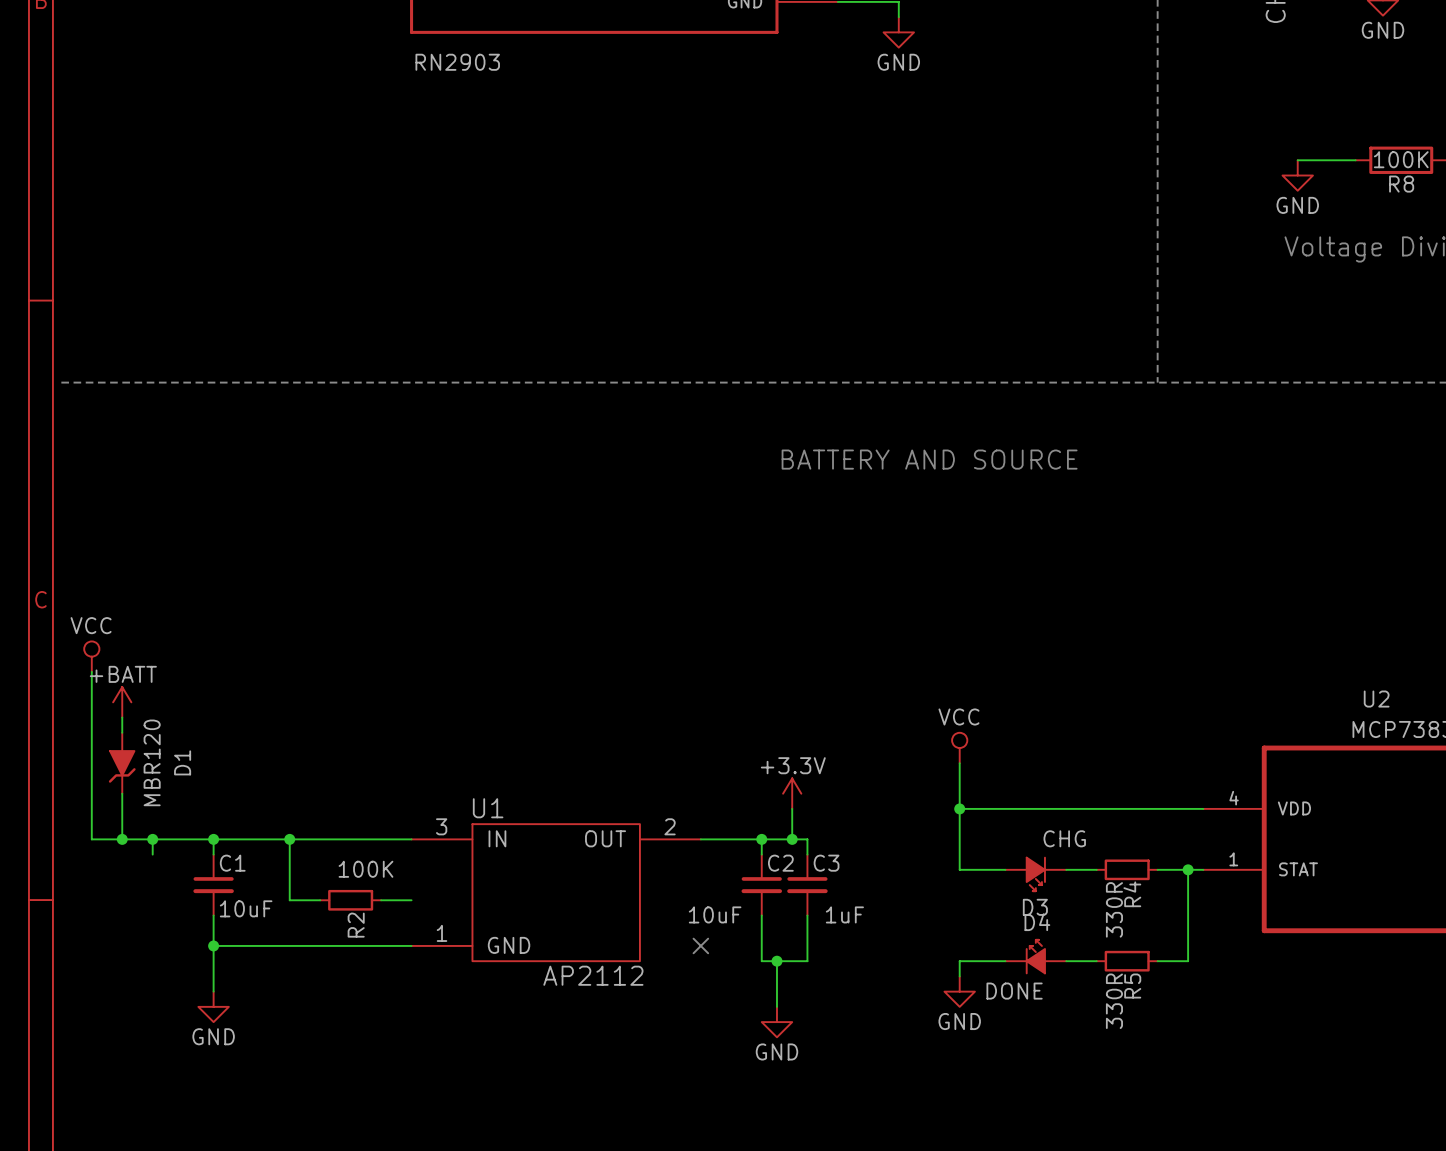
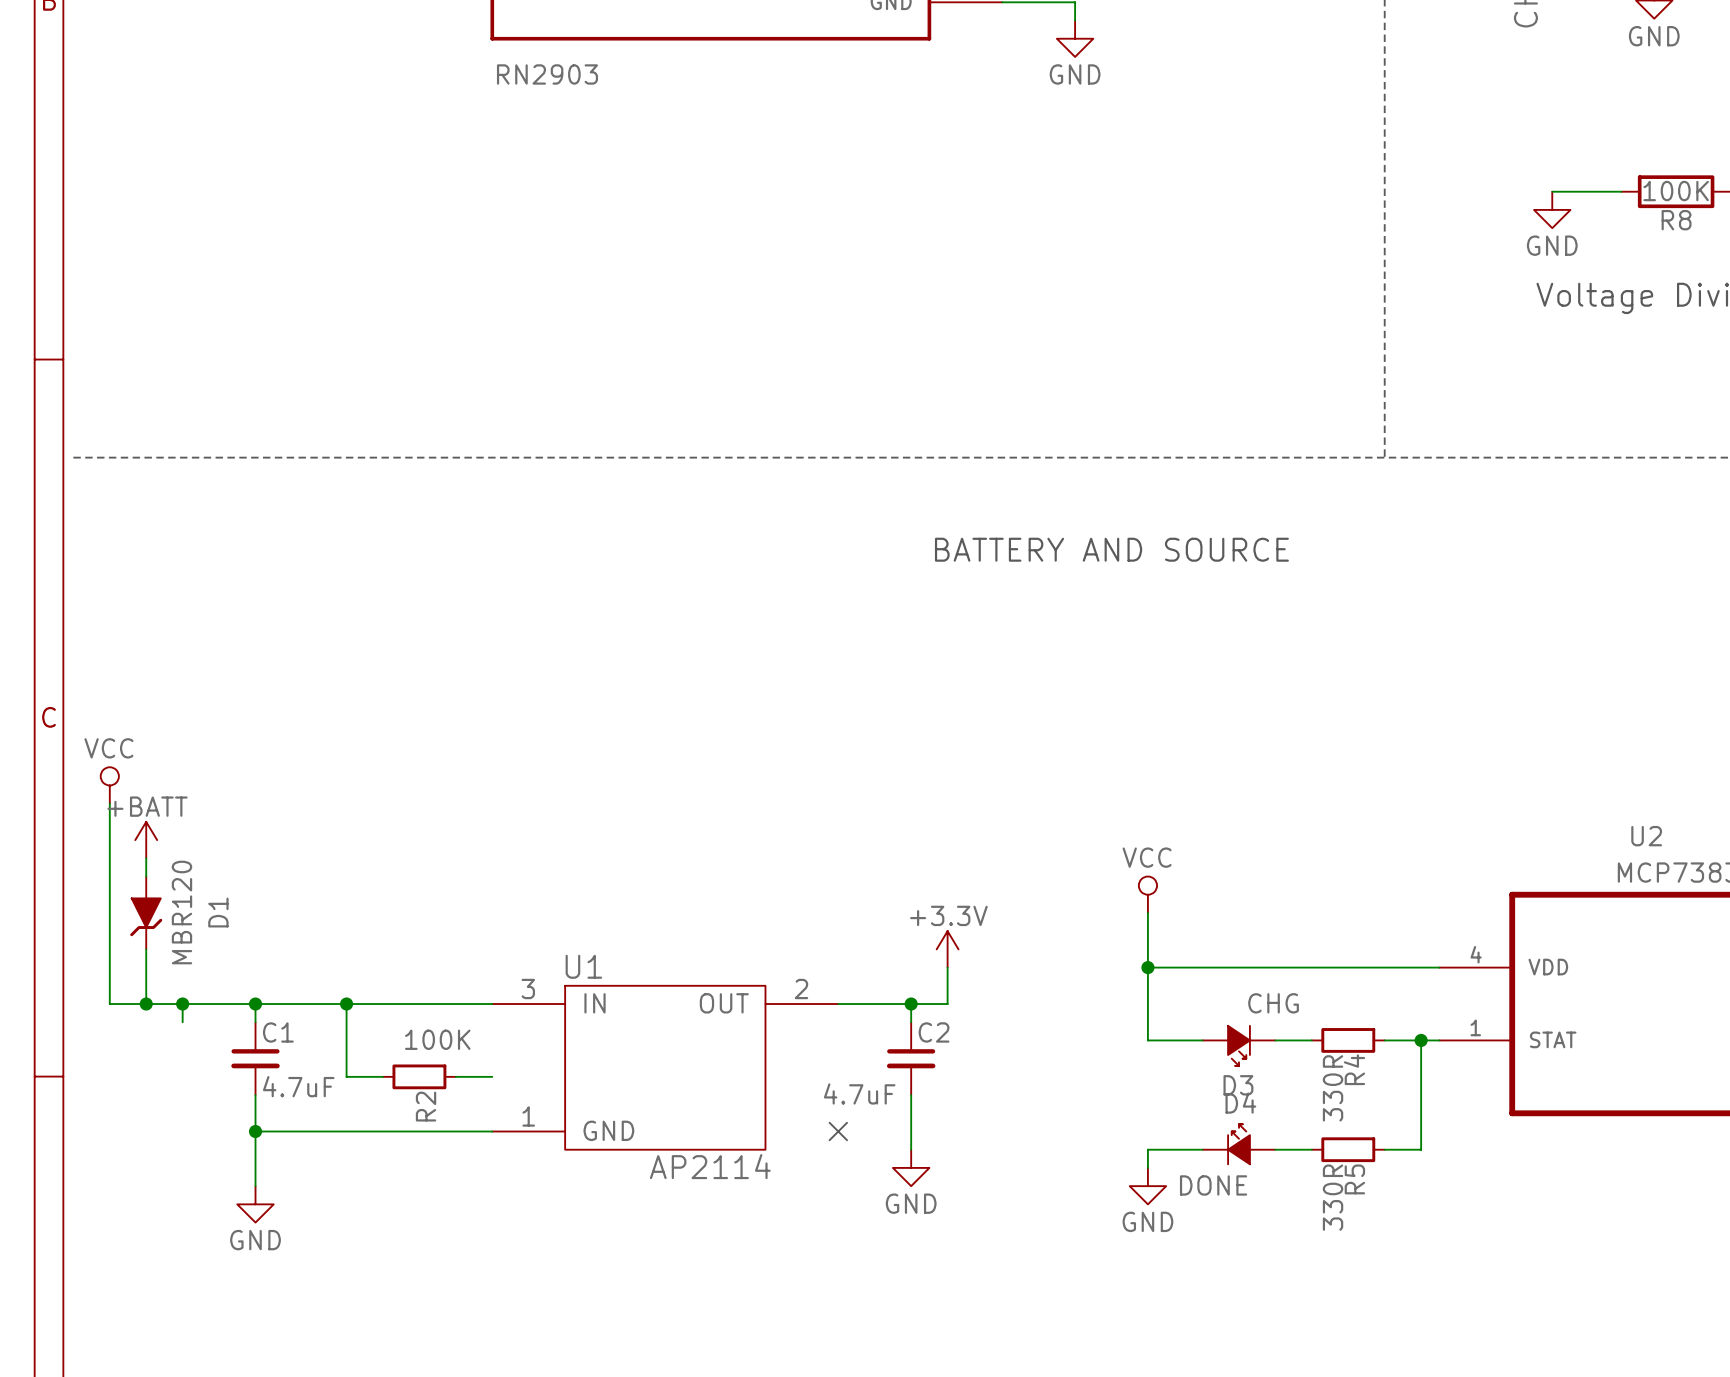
wire: (792, 839) (807, 839) (807, 854) -> none
junction: (792, 839) -> none
C3: 1uF (807, 885) -> none
C1 value: 10uF (246, 908) -> 4.7uF (298, 1086)
C2 value: 10uF (715, 914) -> 4.7uF (859, 1093)
wire: (807, 915) (807, 961) (761, 961) -> none
wire: (776, 961) (776, 1006) -> none
junction: (776, 961) -> none
U1 value: AP2112 (593, 975) -> AP2114 (710, 1166)
power symbol position: GND (776, 1022) -> GND (911, 1167)

